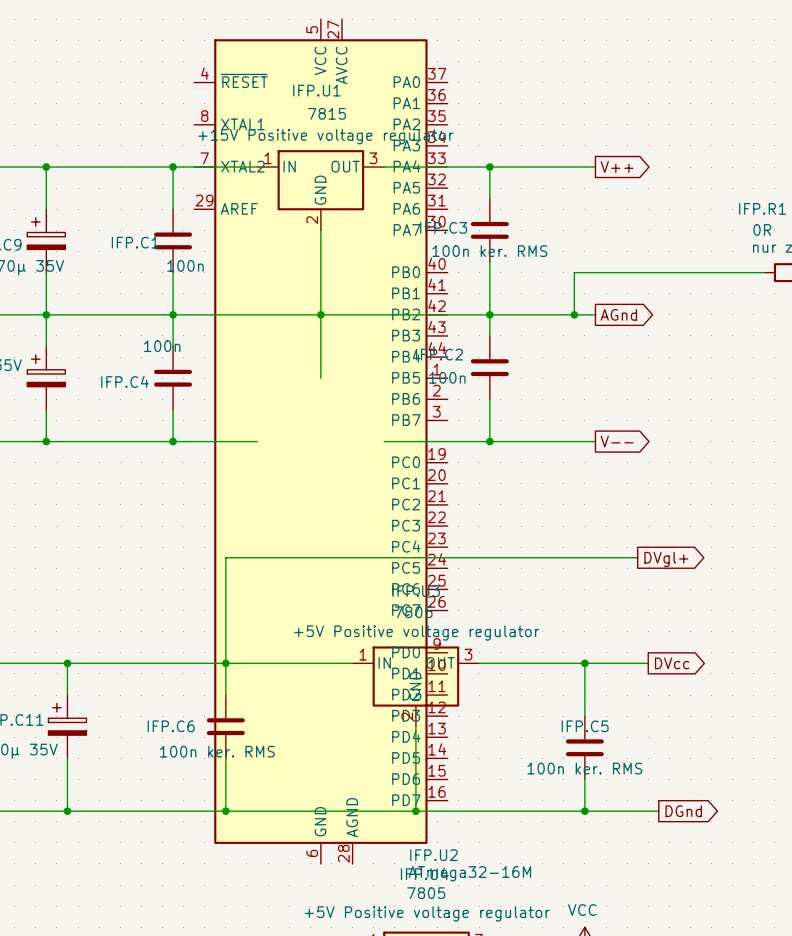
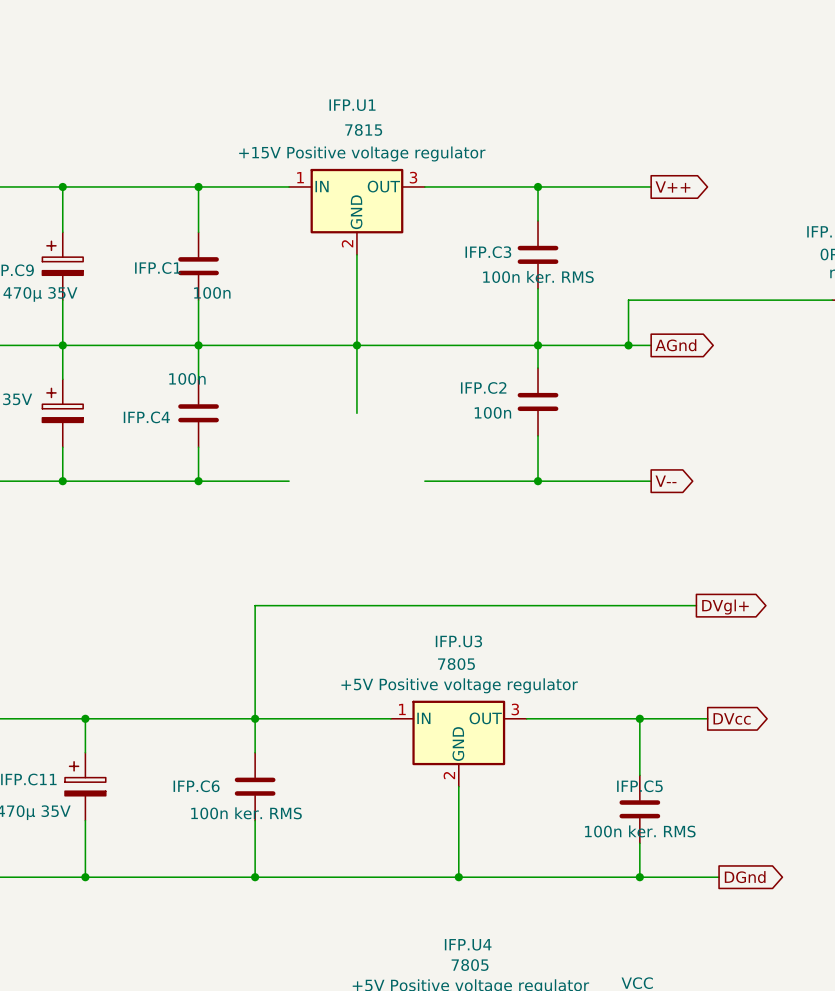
IFP.U2: ATmega32-16M (320, 441) -> none

